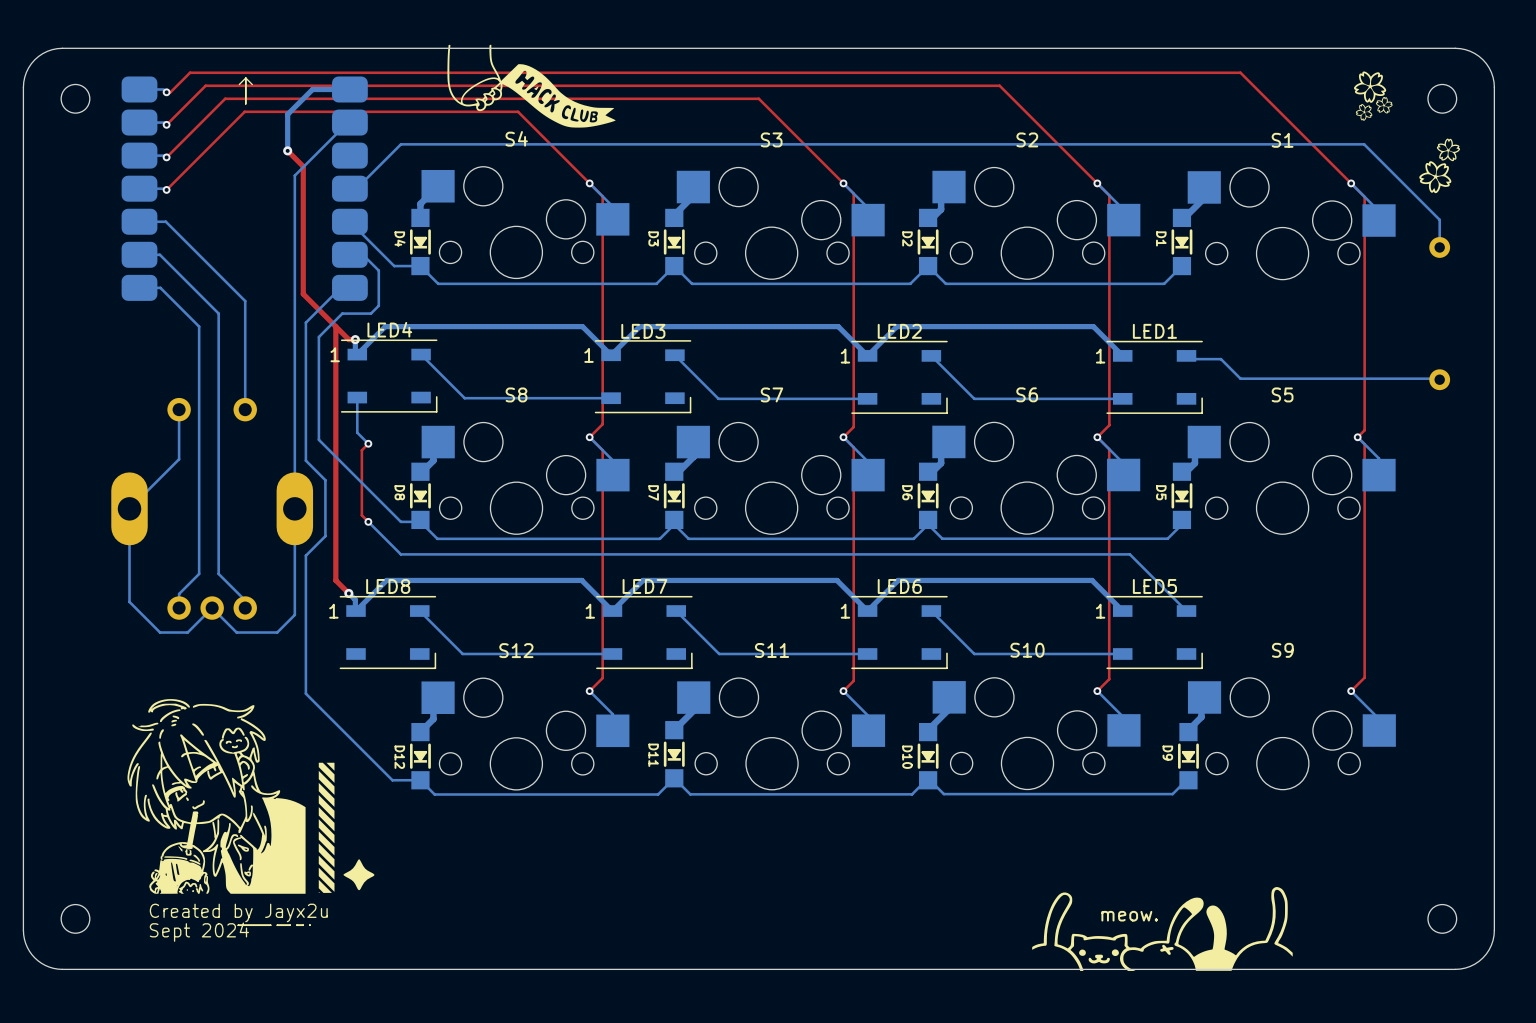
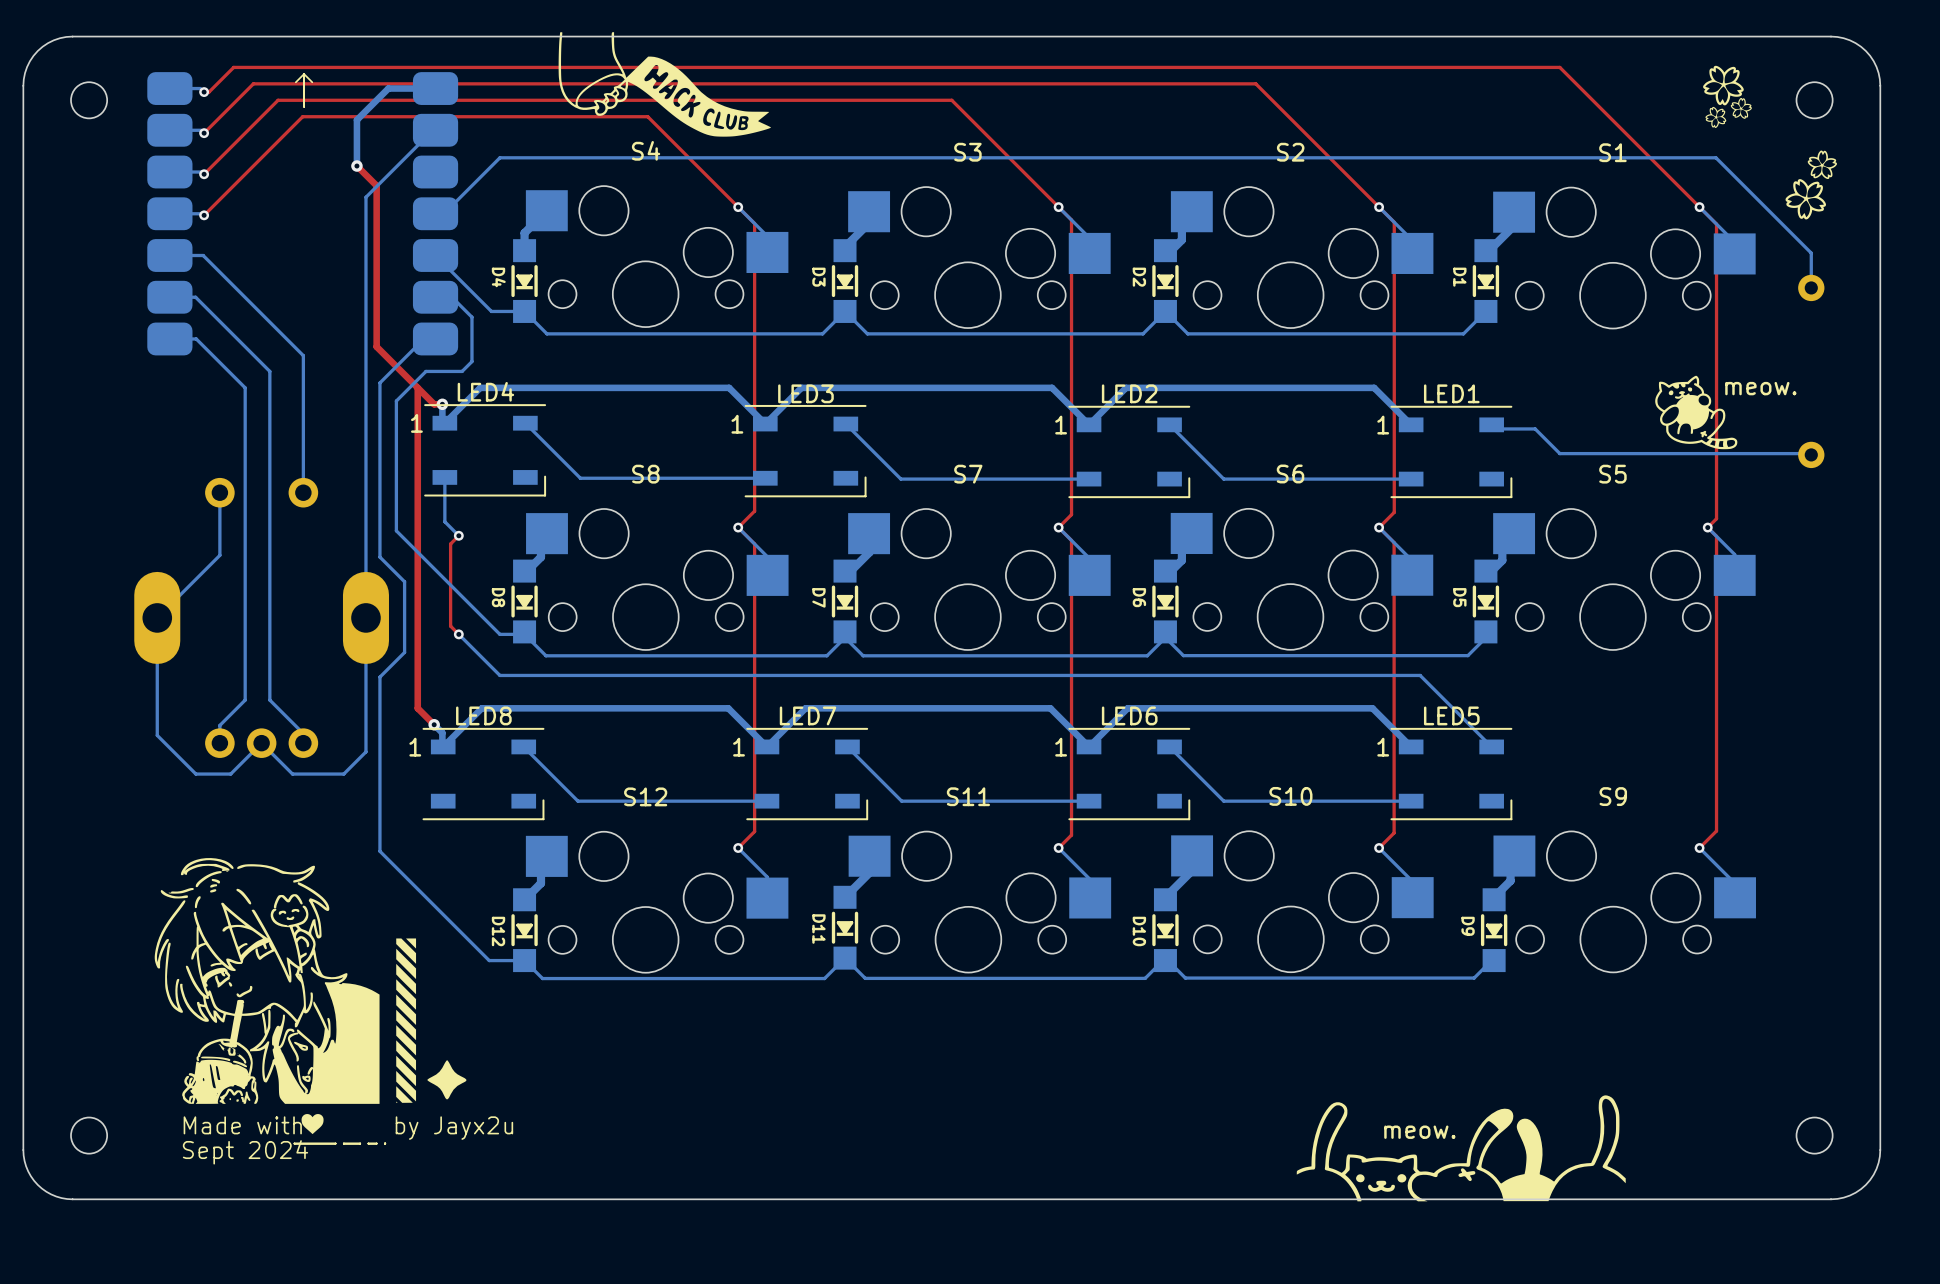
drawing: none -> [1655, 375, 1738, 450]
text: none -> meow. (1760, 388)
drawing: none -> [301, 1114, 324, 1135]
text: Created by Jayx2u (238, 912) -> Made with by Jayx2u (348, 1128)

